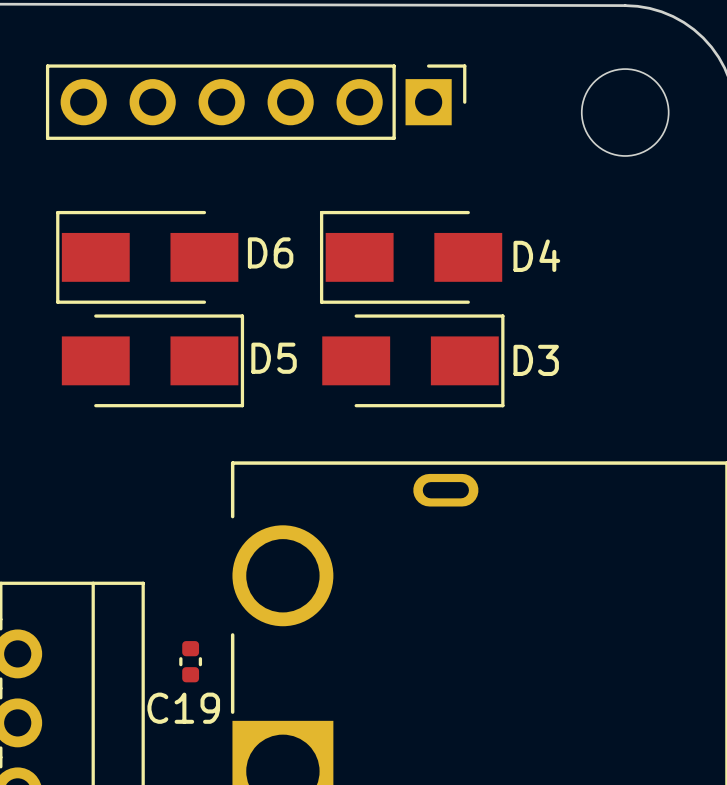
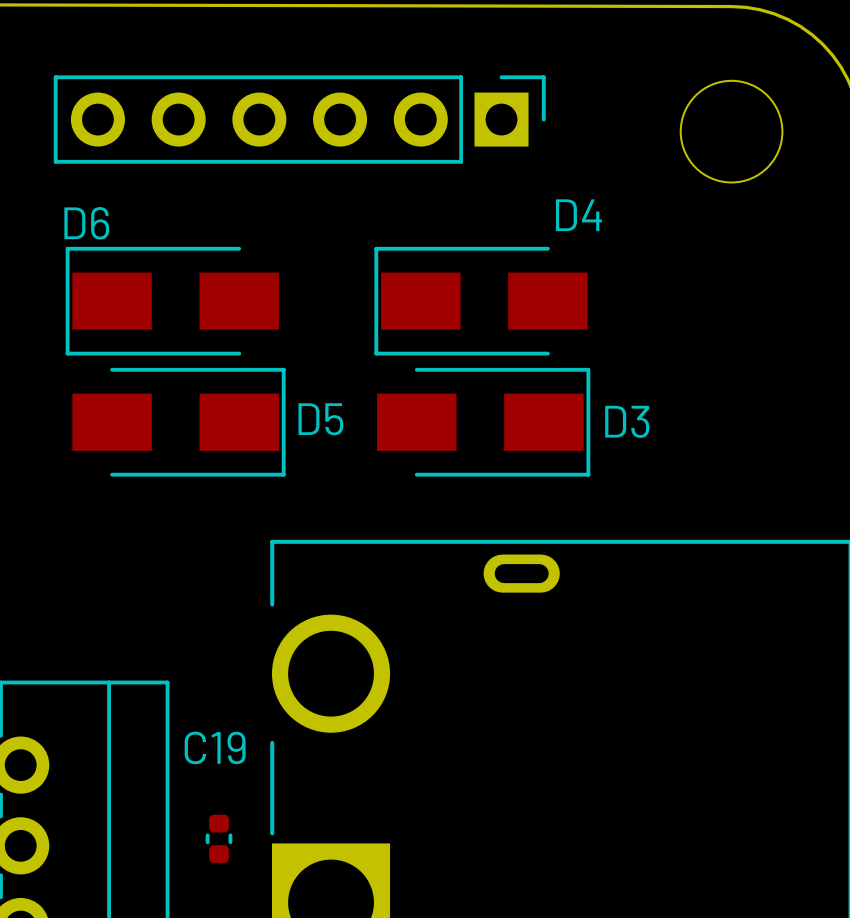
D6 name position: D6 (270, 252) -> D6 (86, 223)
D4 name position: D4 (536, 255) -> D4 (578, 215)
C19 position: (190, 661) -> (219, 838)
C19 name position: C19 (183, 708) -> C19 (215, 747)

